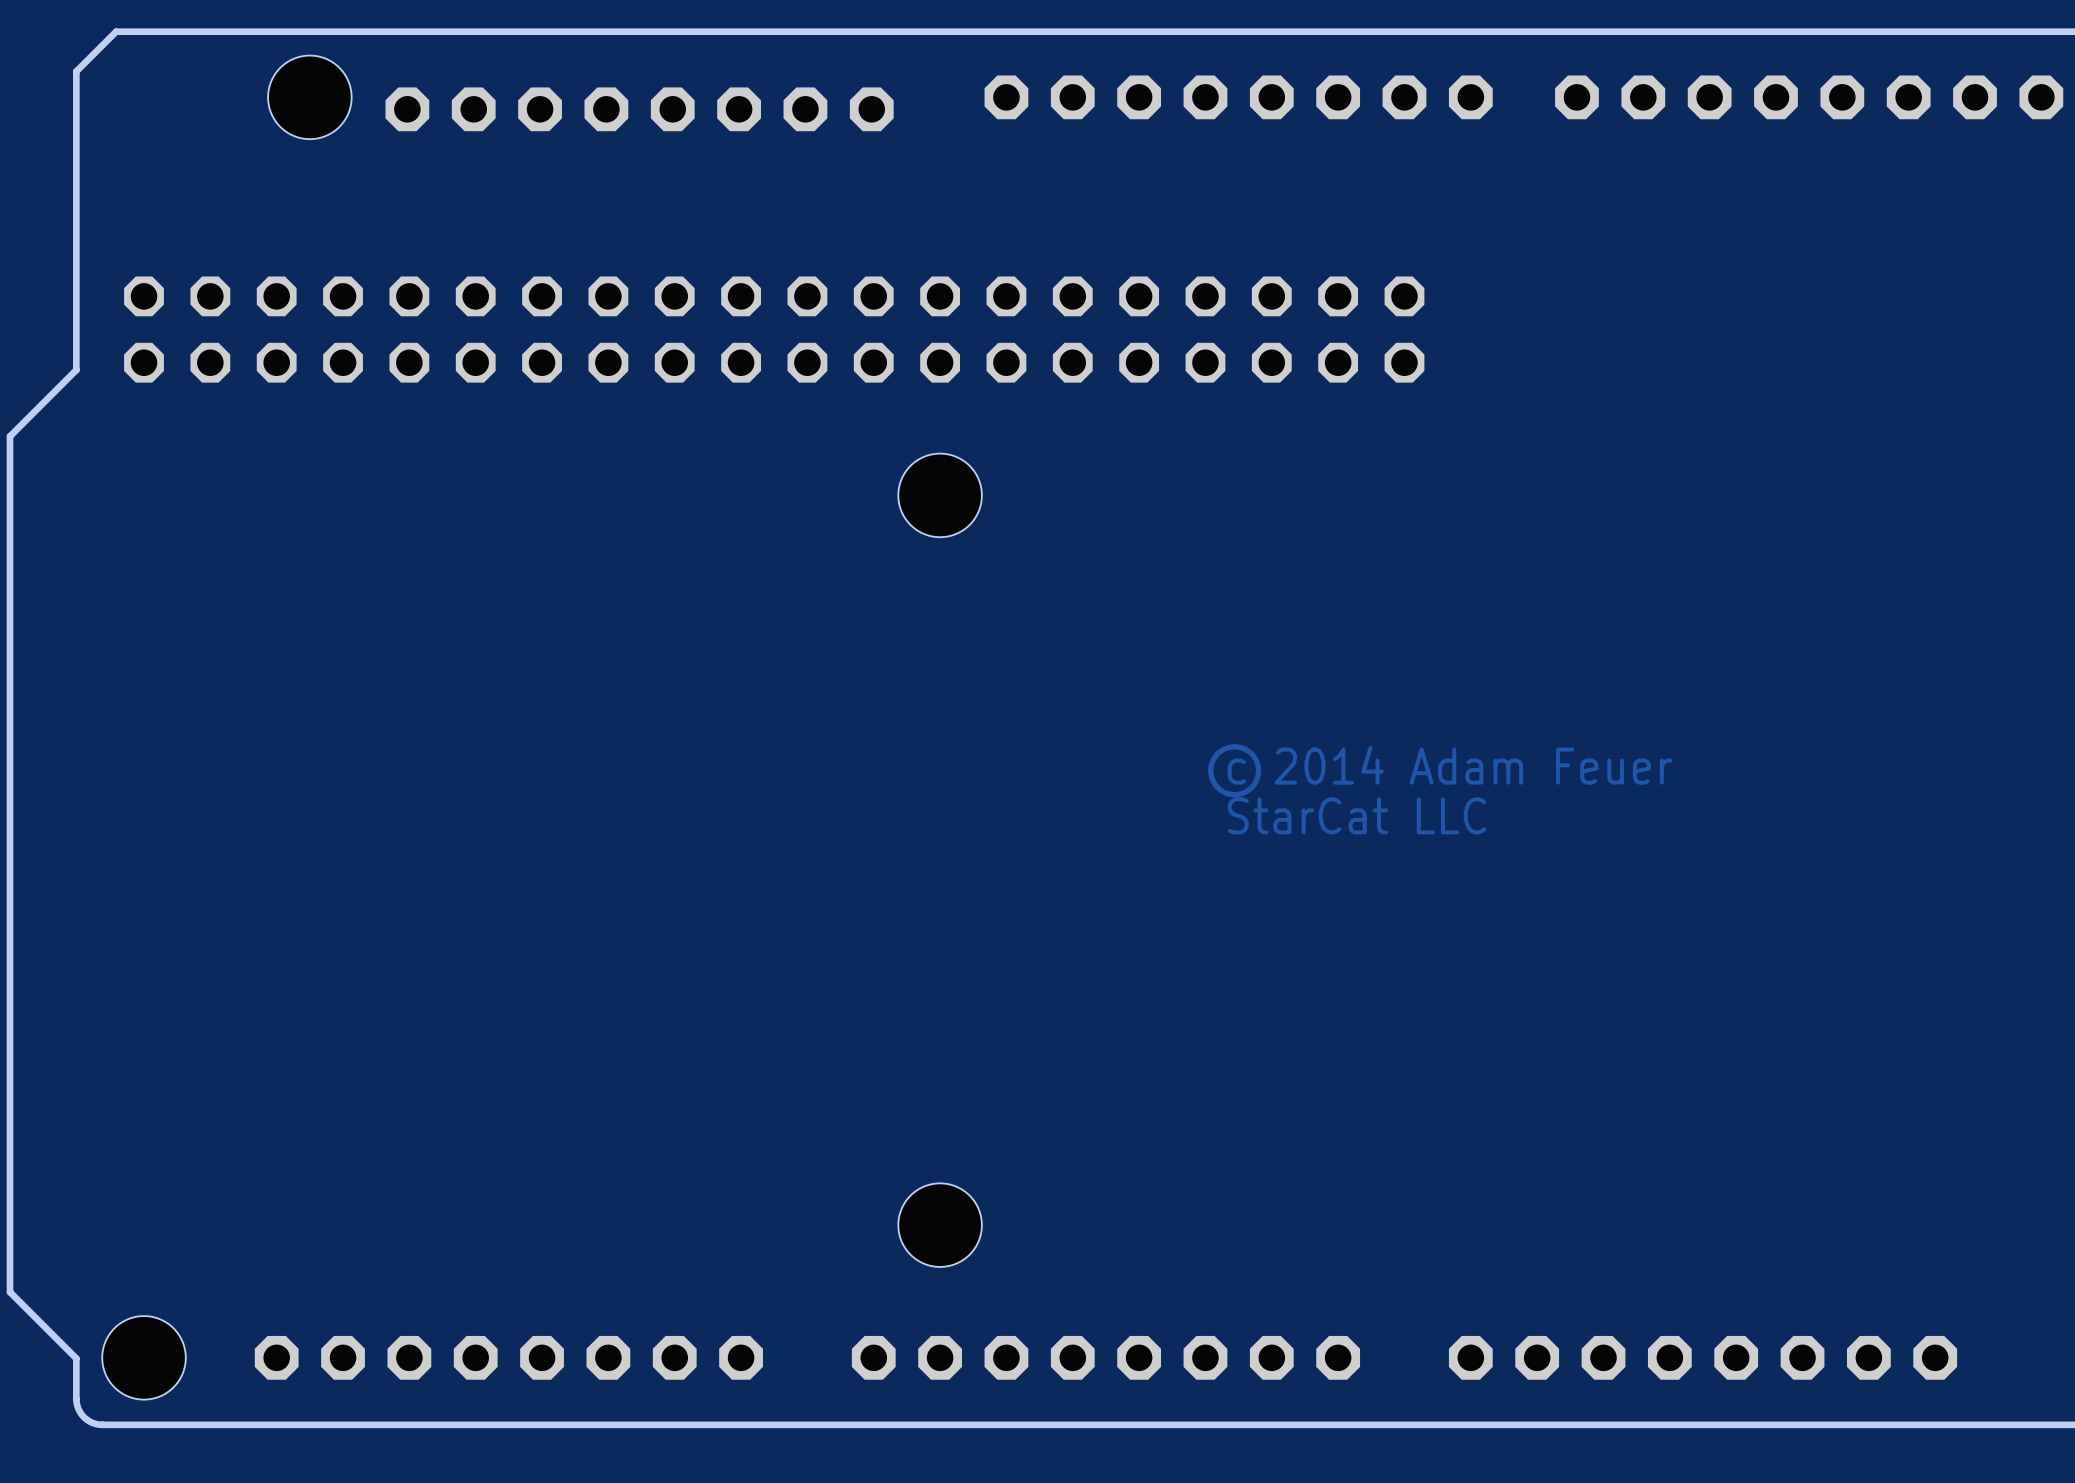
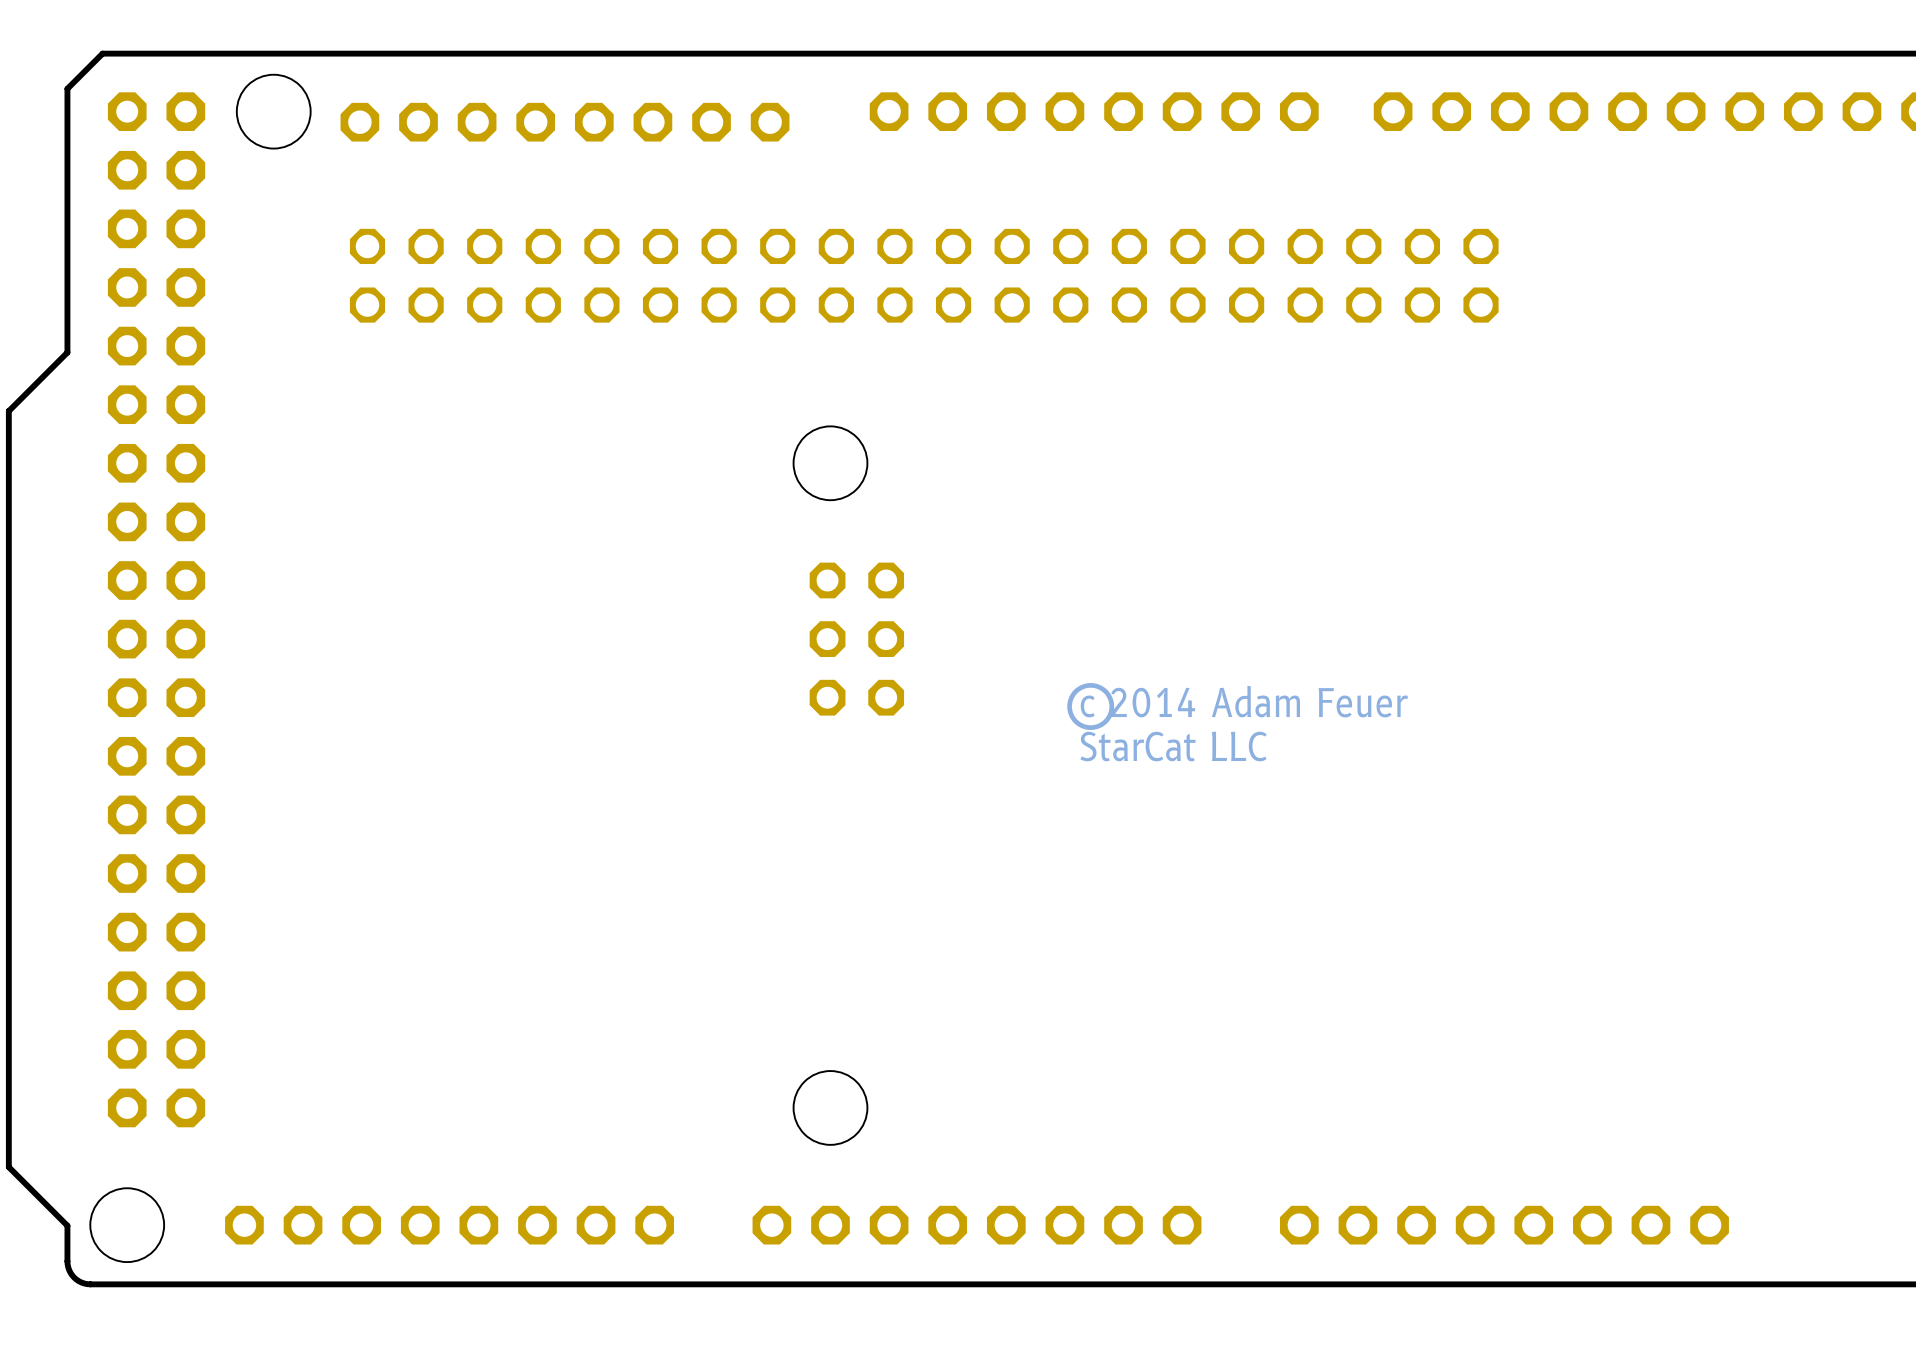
part position: (774, 329) -> (924, 275)
part: none -> (156, 609)
part: none -> (856, 639)

